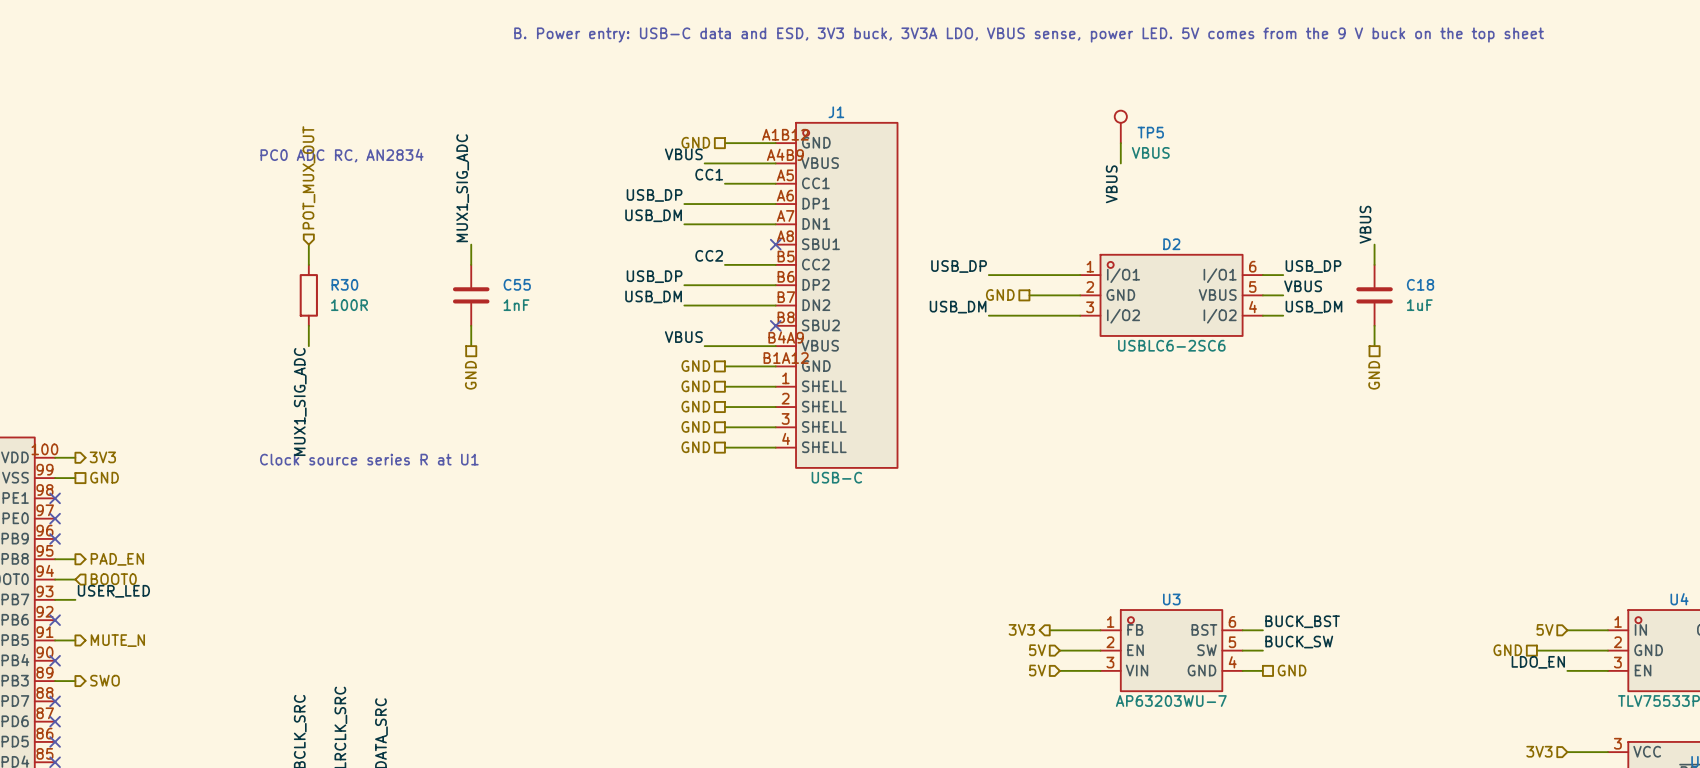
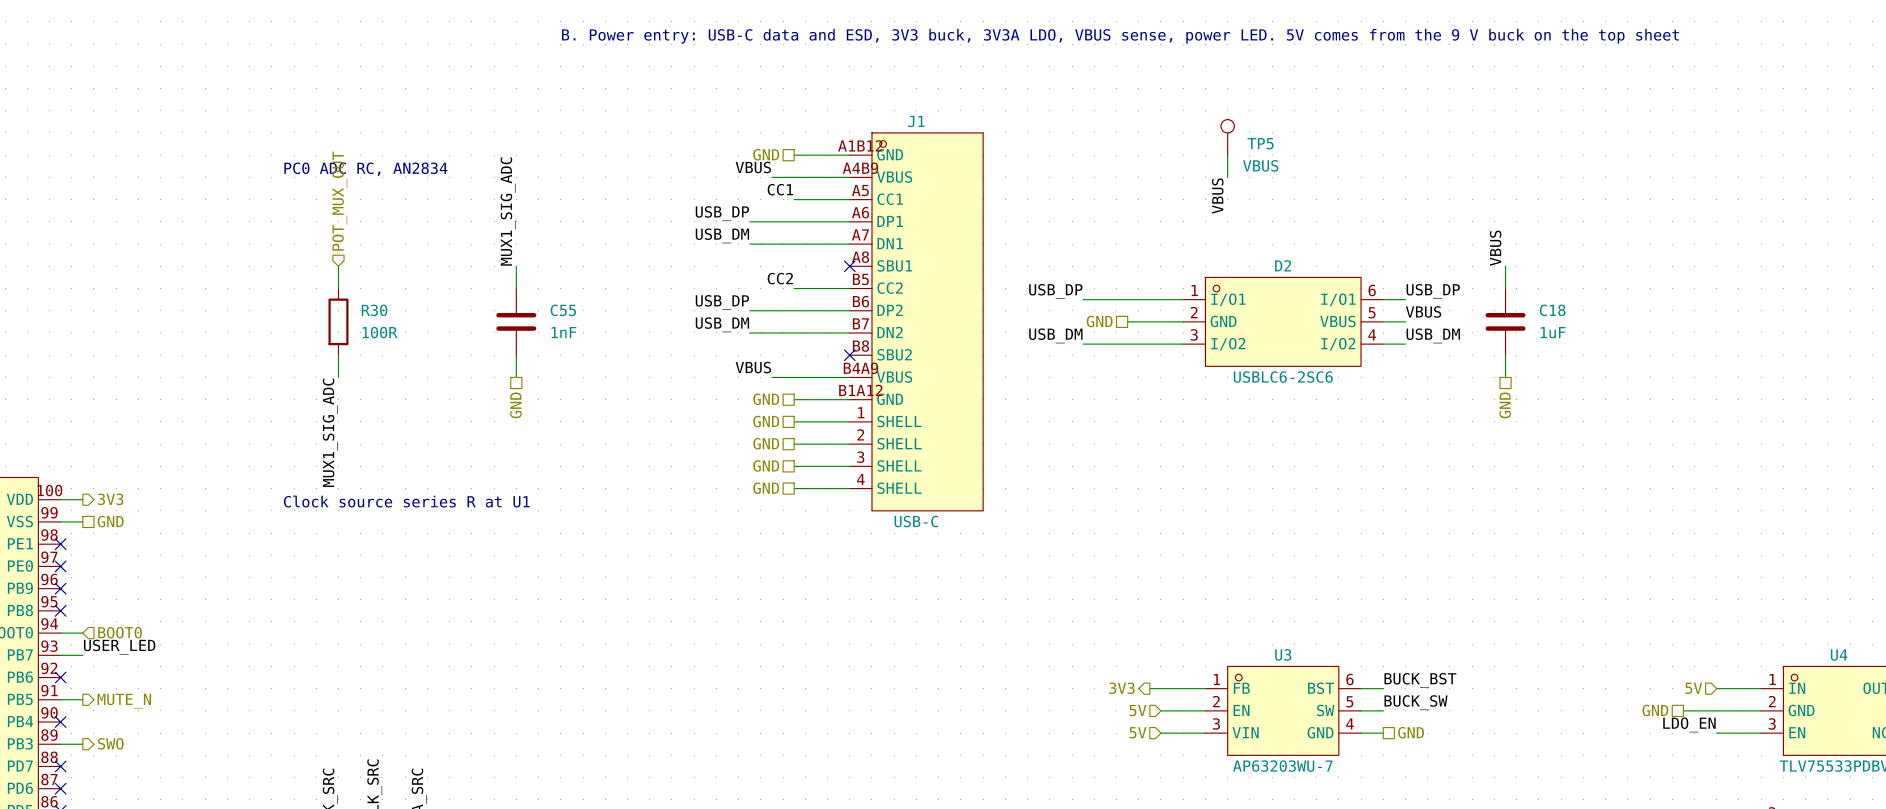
wire: (55, 559) (75, 559) -> none
no-connect mark: none -> (60, 610)
hierarchical label: PAD_EN (117, 559) -> none

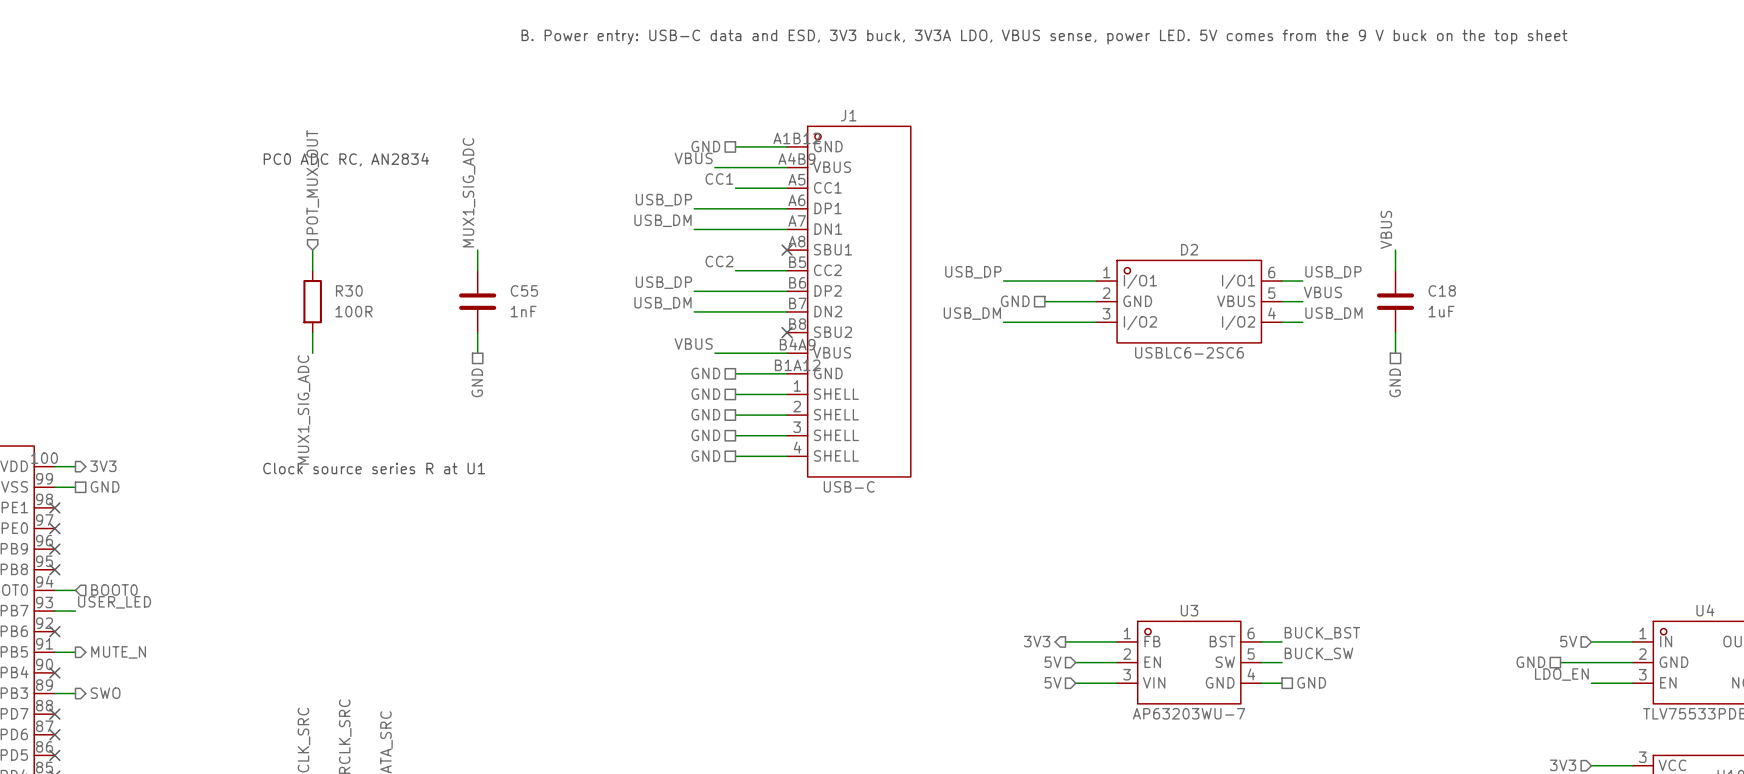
TP5: VBUS (1227, 137) -> none
wire: (1227, 155) (1227, 177) -> none
label: VBUS (1217, 196) -> none

